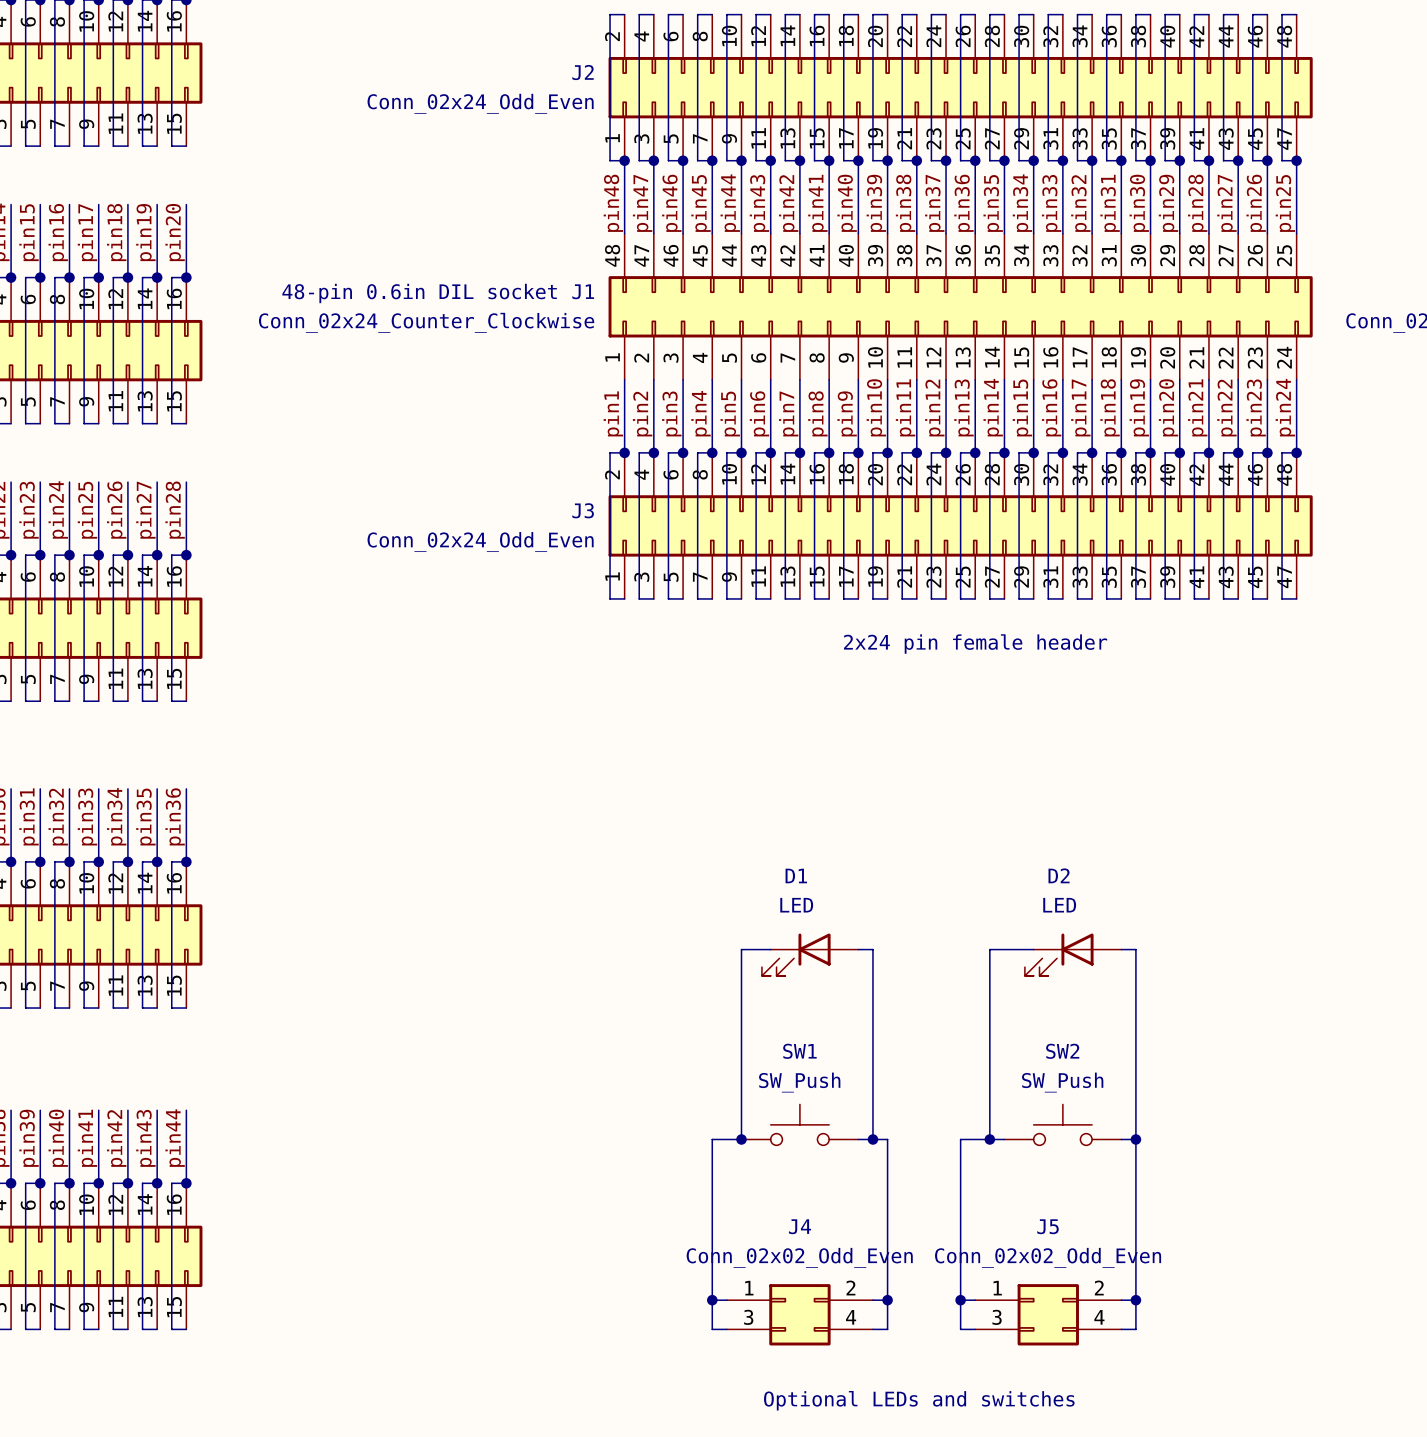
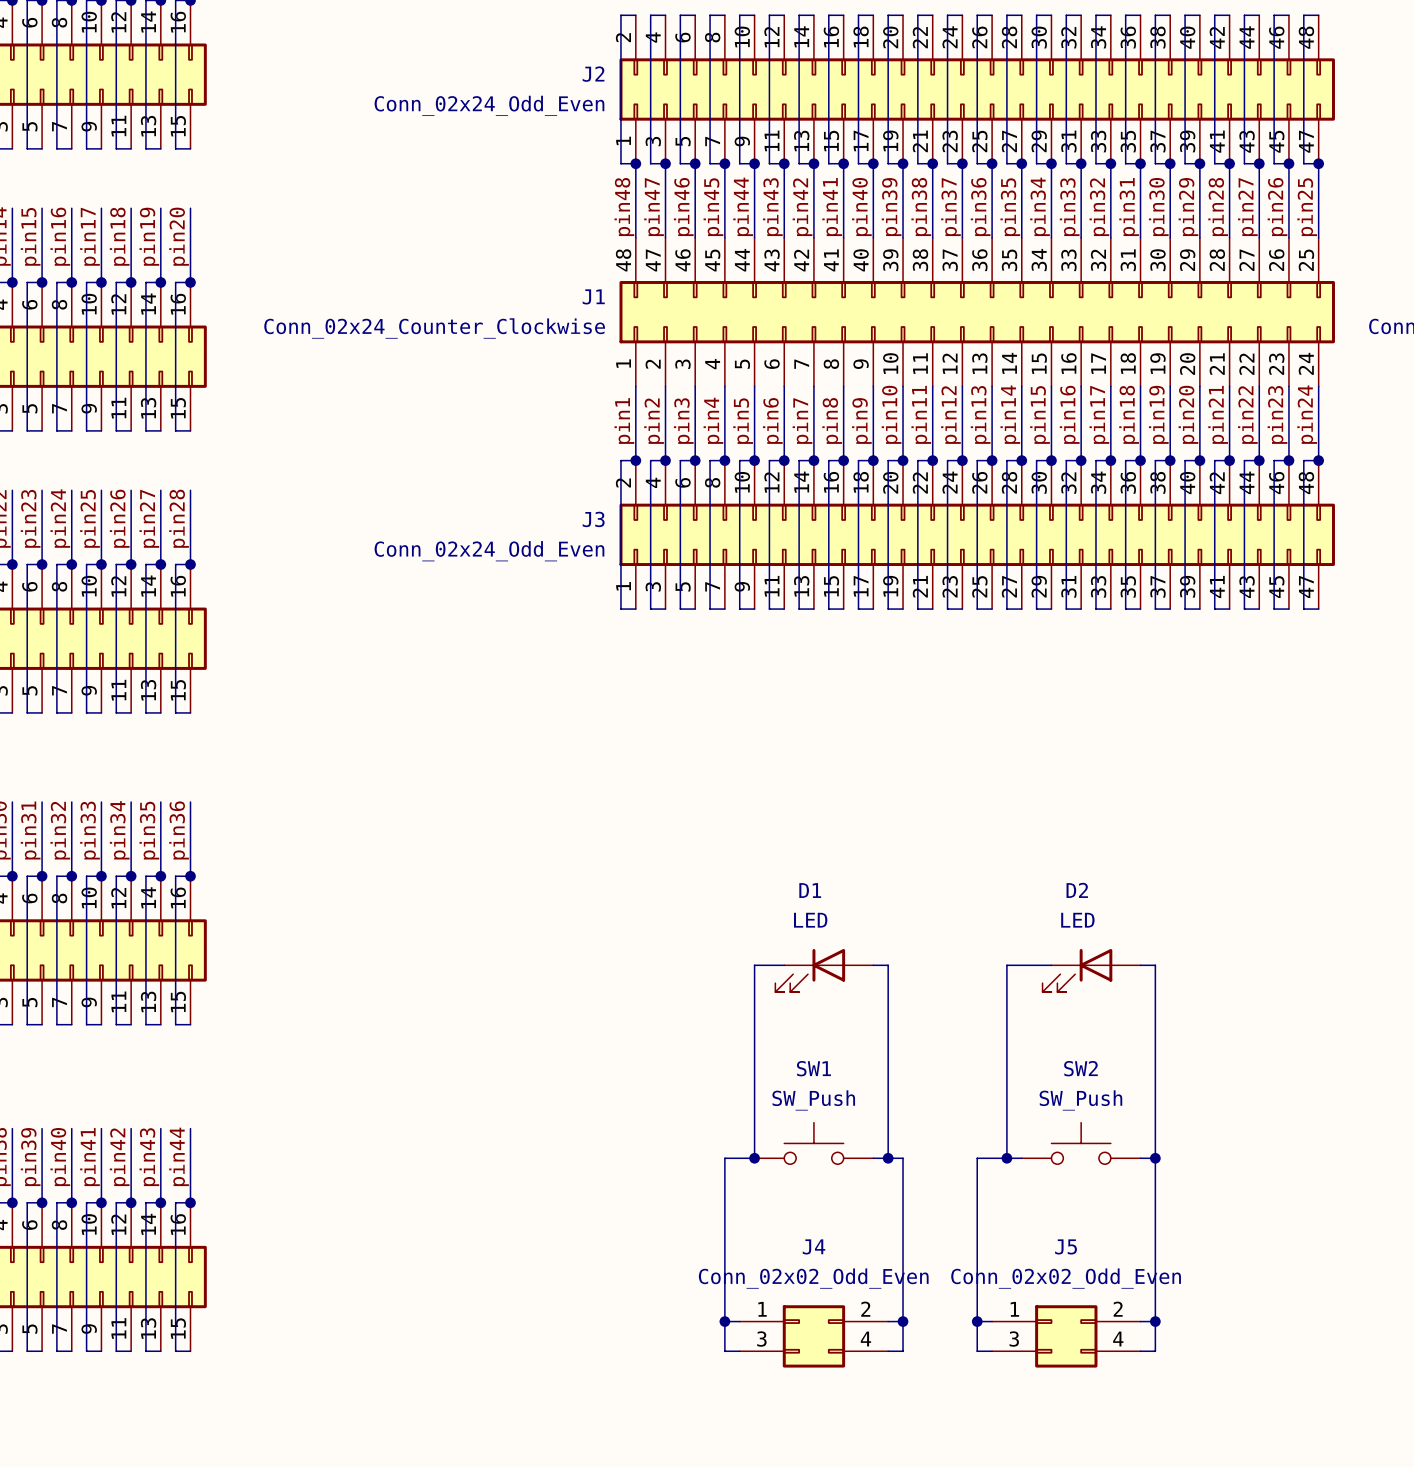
text: 48-pin 0.6in DIL socket (419, 293) -> none
text: 2x24 pin female header (975, 644) -> none
text: Optional LEDs and switches (919, 1400) -> none

